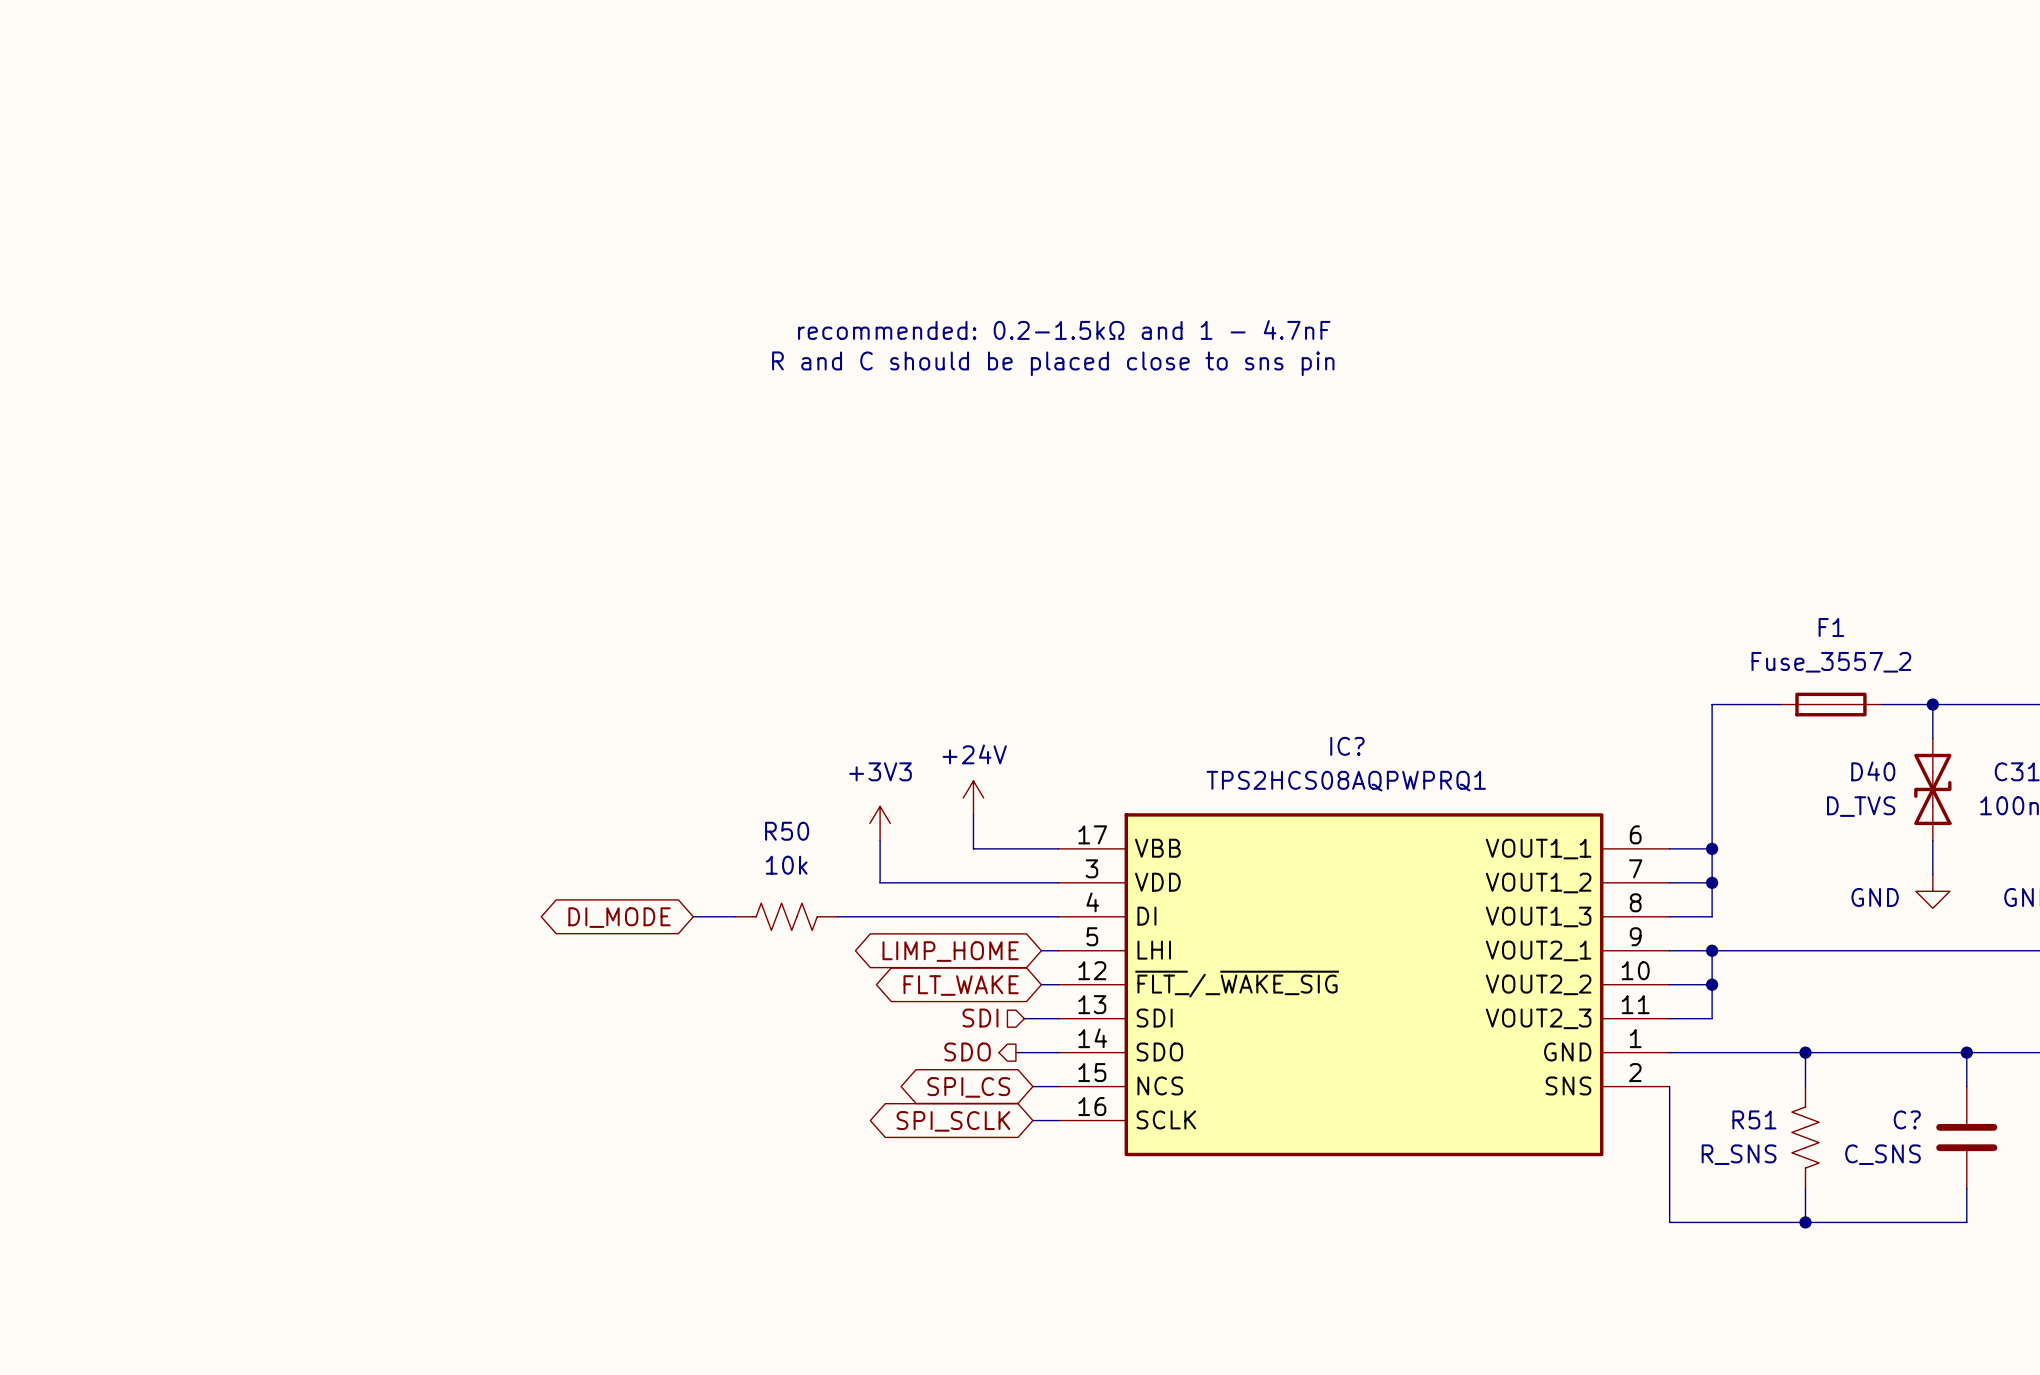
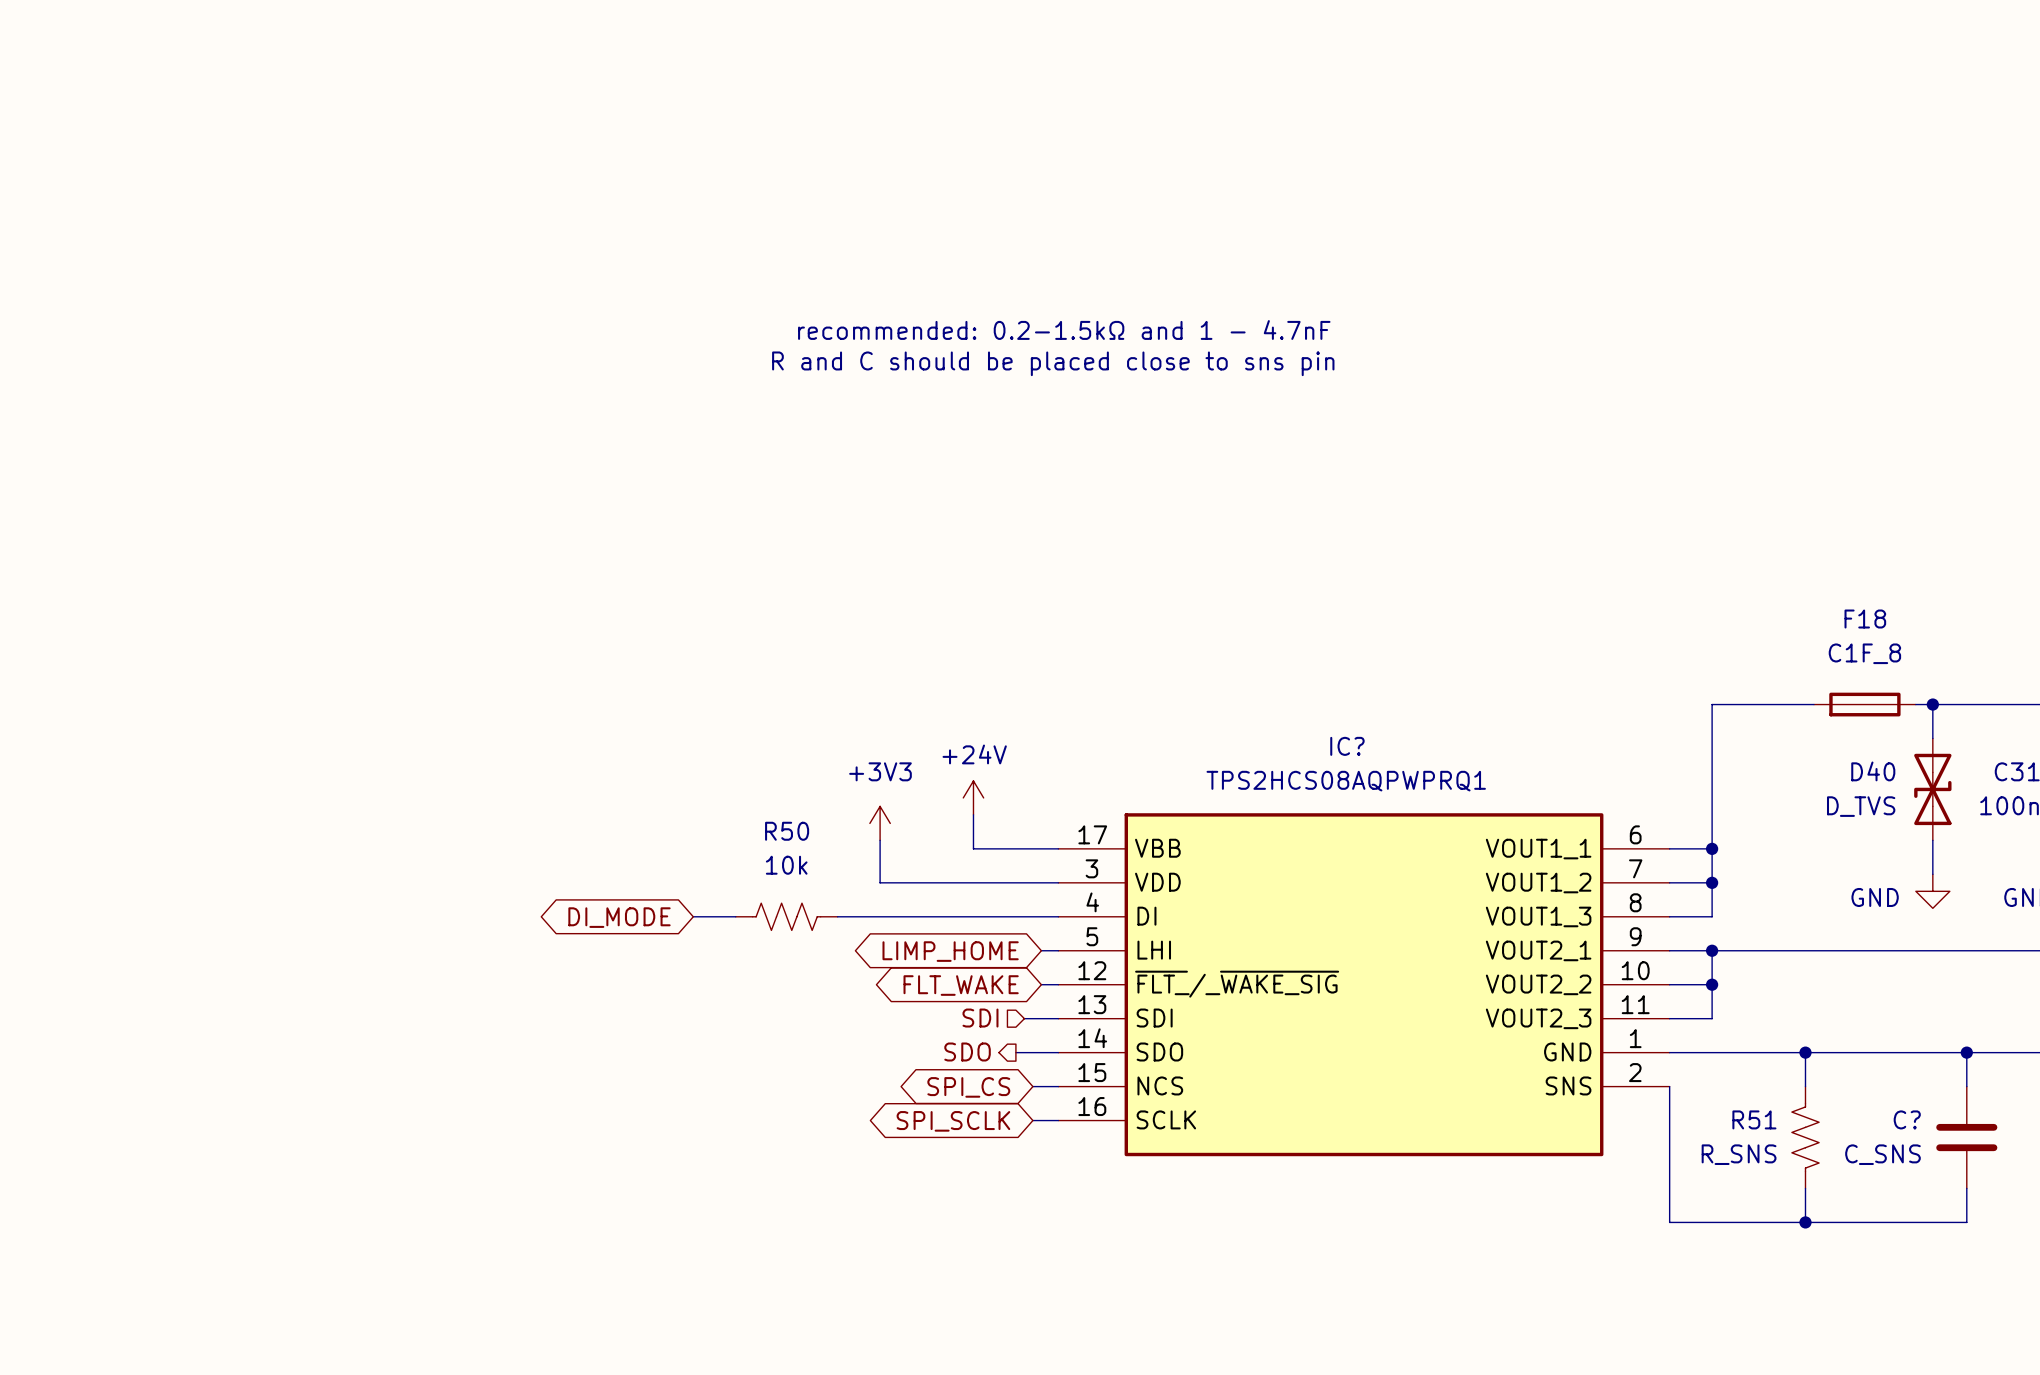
F1: Fuse_3557_2 (1830, 704) -> none
F18: none -> C1F_8 (1864, 704)

